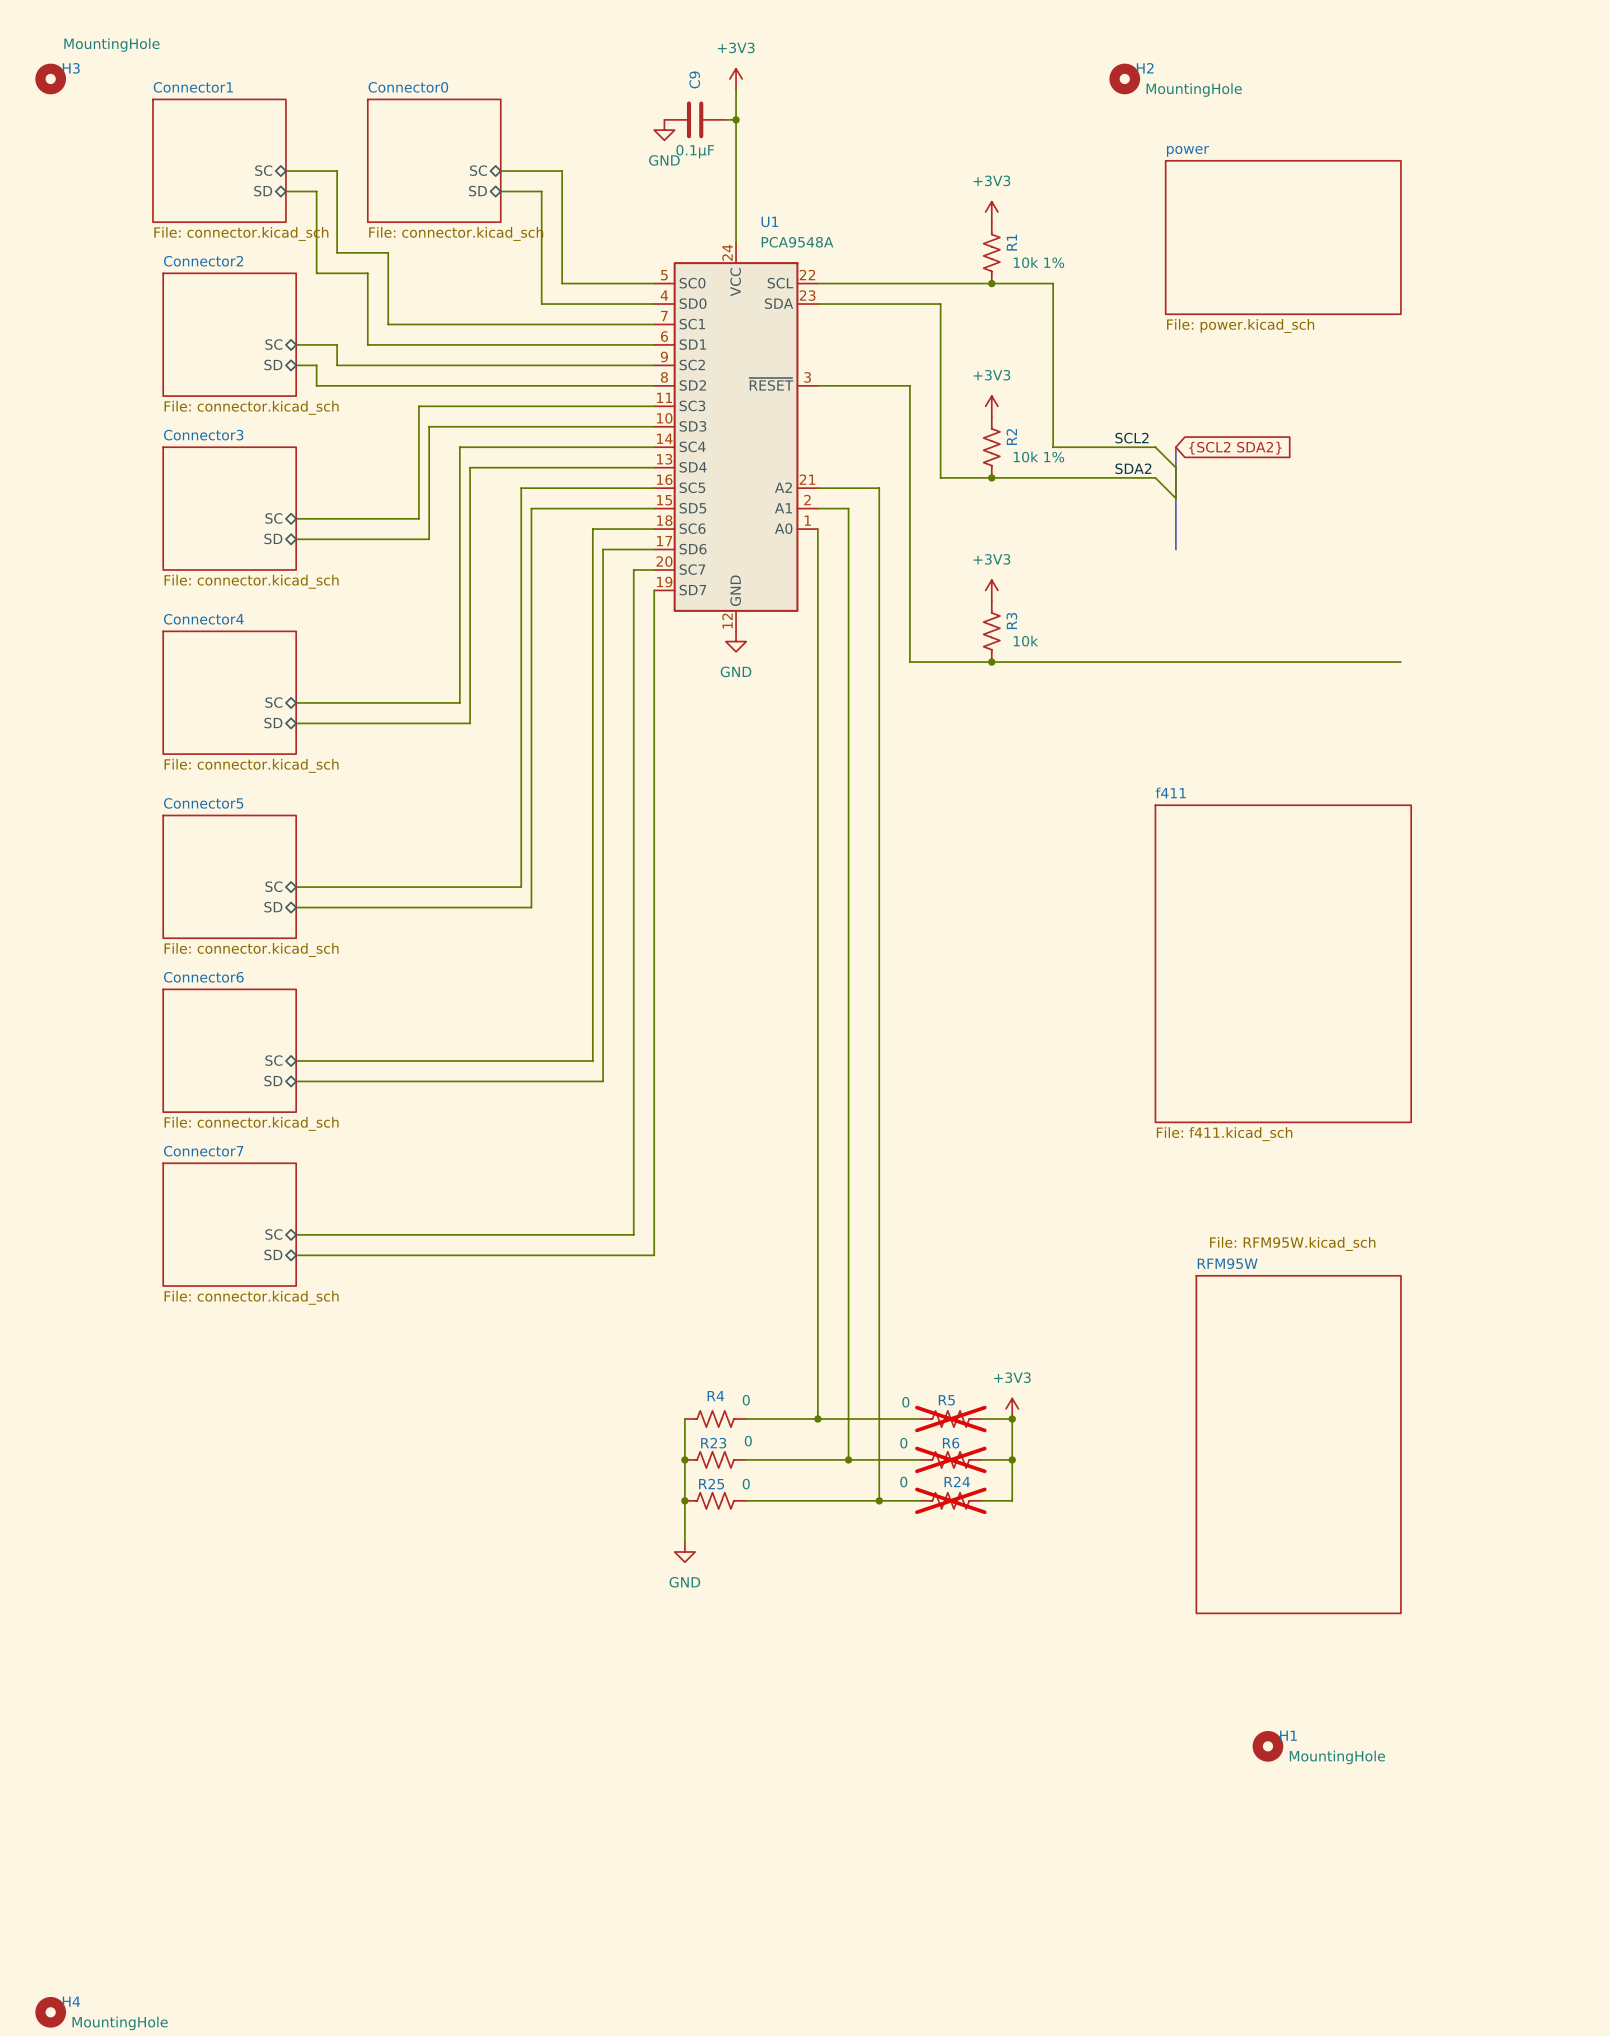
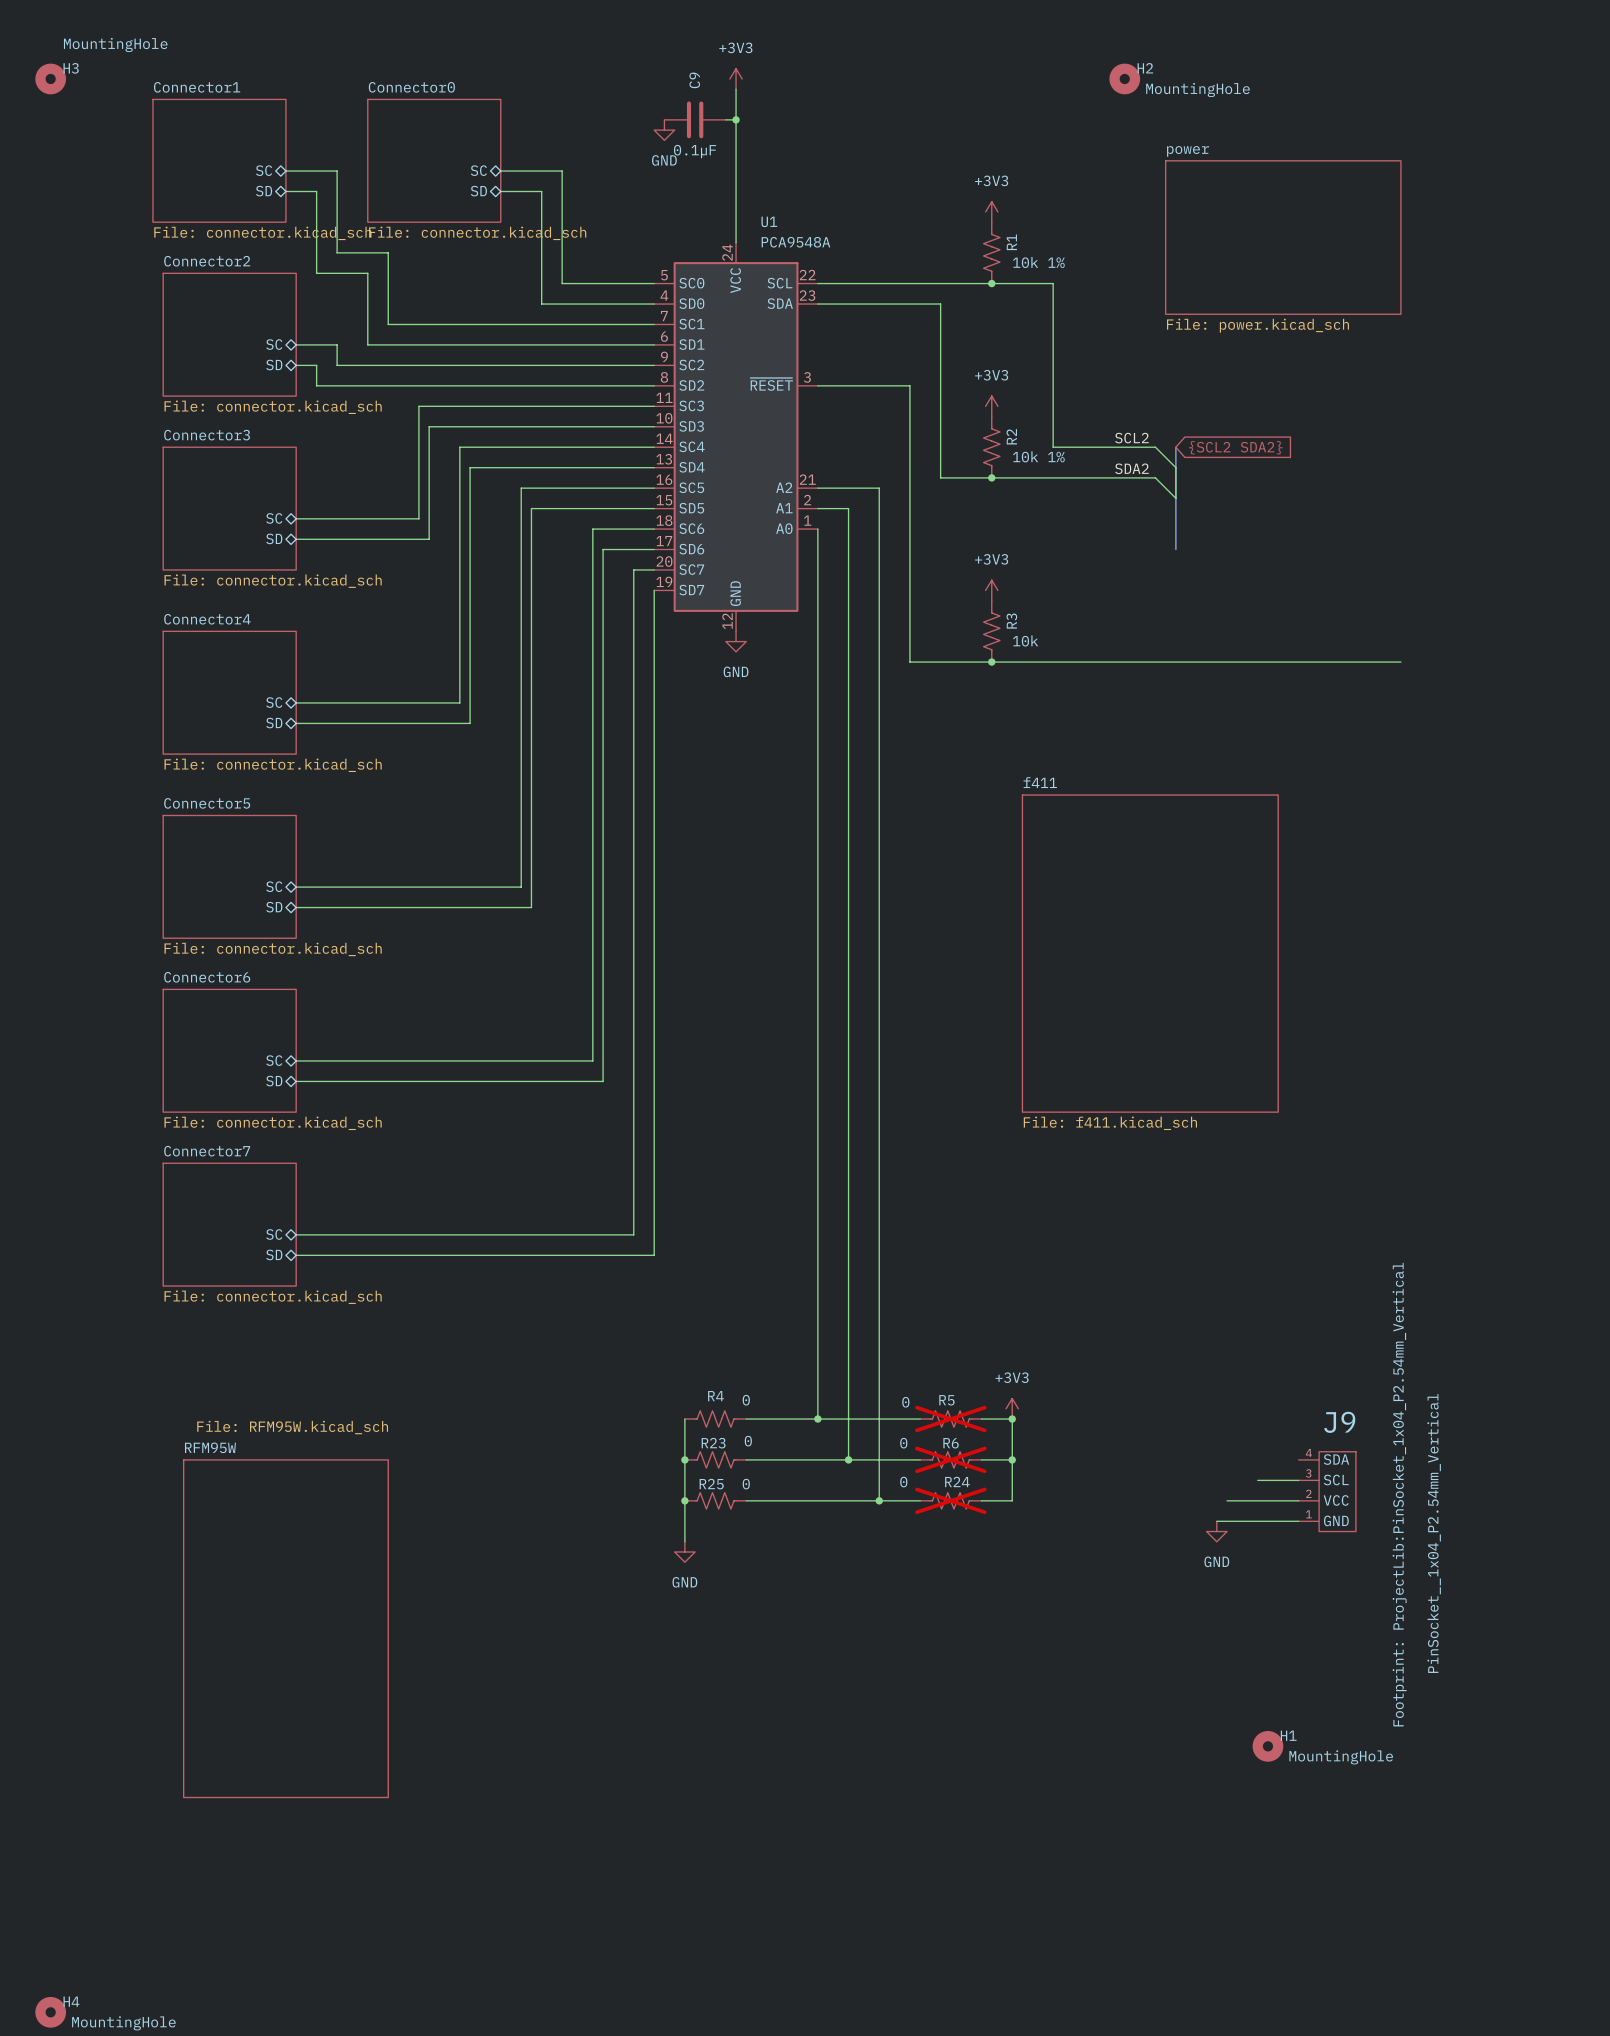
sheet f411 position: (1283, 963) -> (1150, 953)
sheet RFM95W position: (1298, 1444) -> (285, 1628)
wire: none -> (1257, 1480) (1298, 1480)
J9: none -> PinSocket__1x04_P2.54mm_Vertical (1327, 1491)
wire: none -> (1227, 1500) (1298, 1500)
wire: none -> (1216, 1521) (1298, 1521)
power symbol: none -> GND (1216, 1531)

